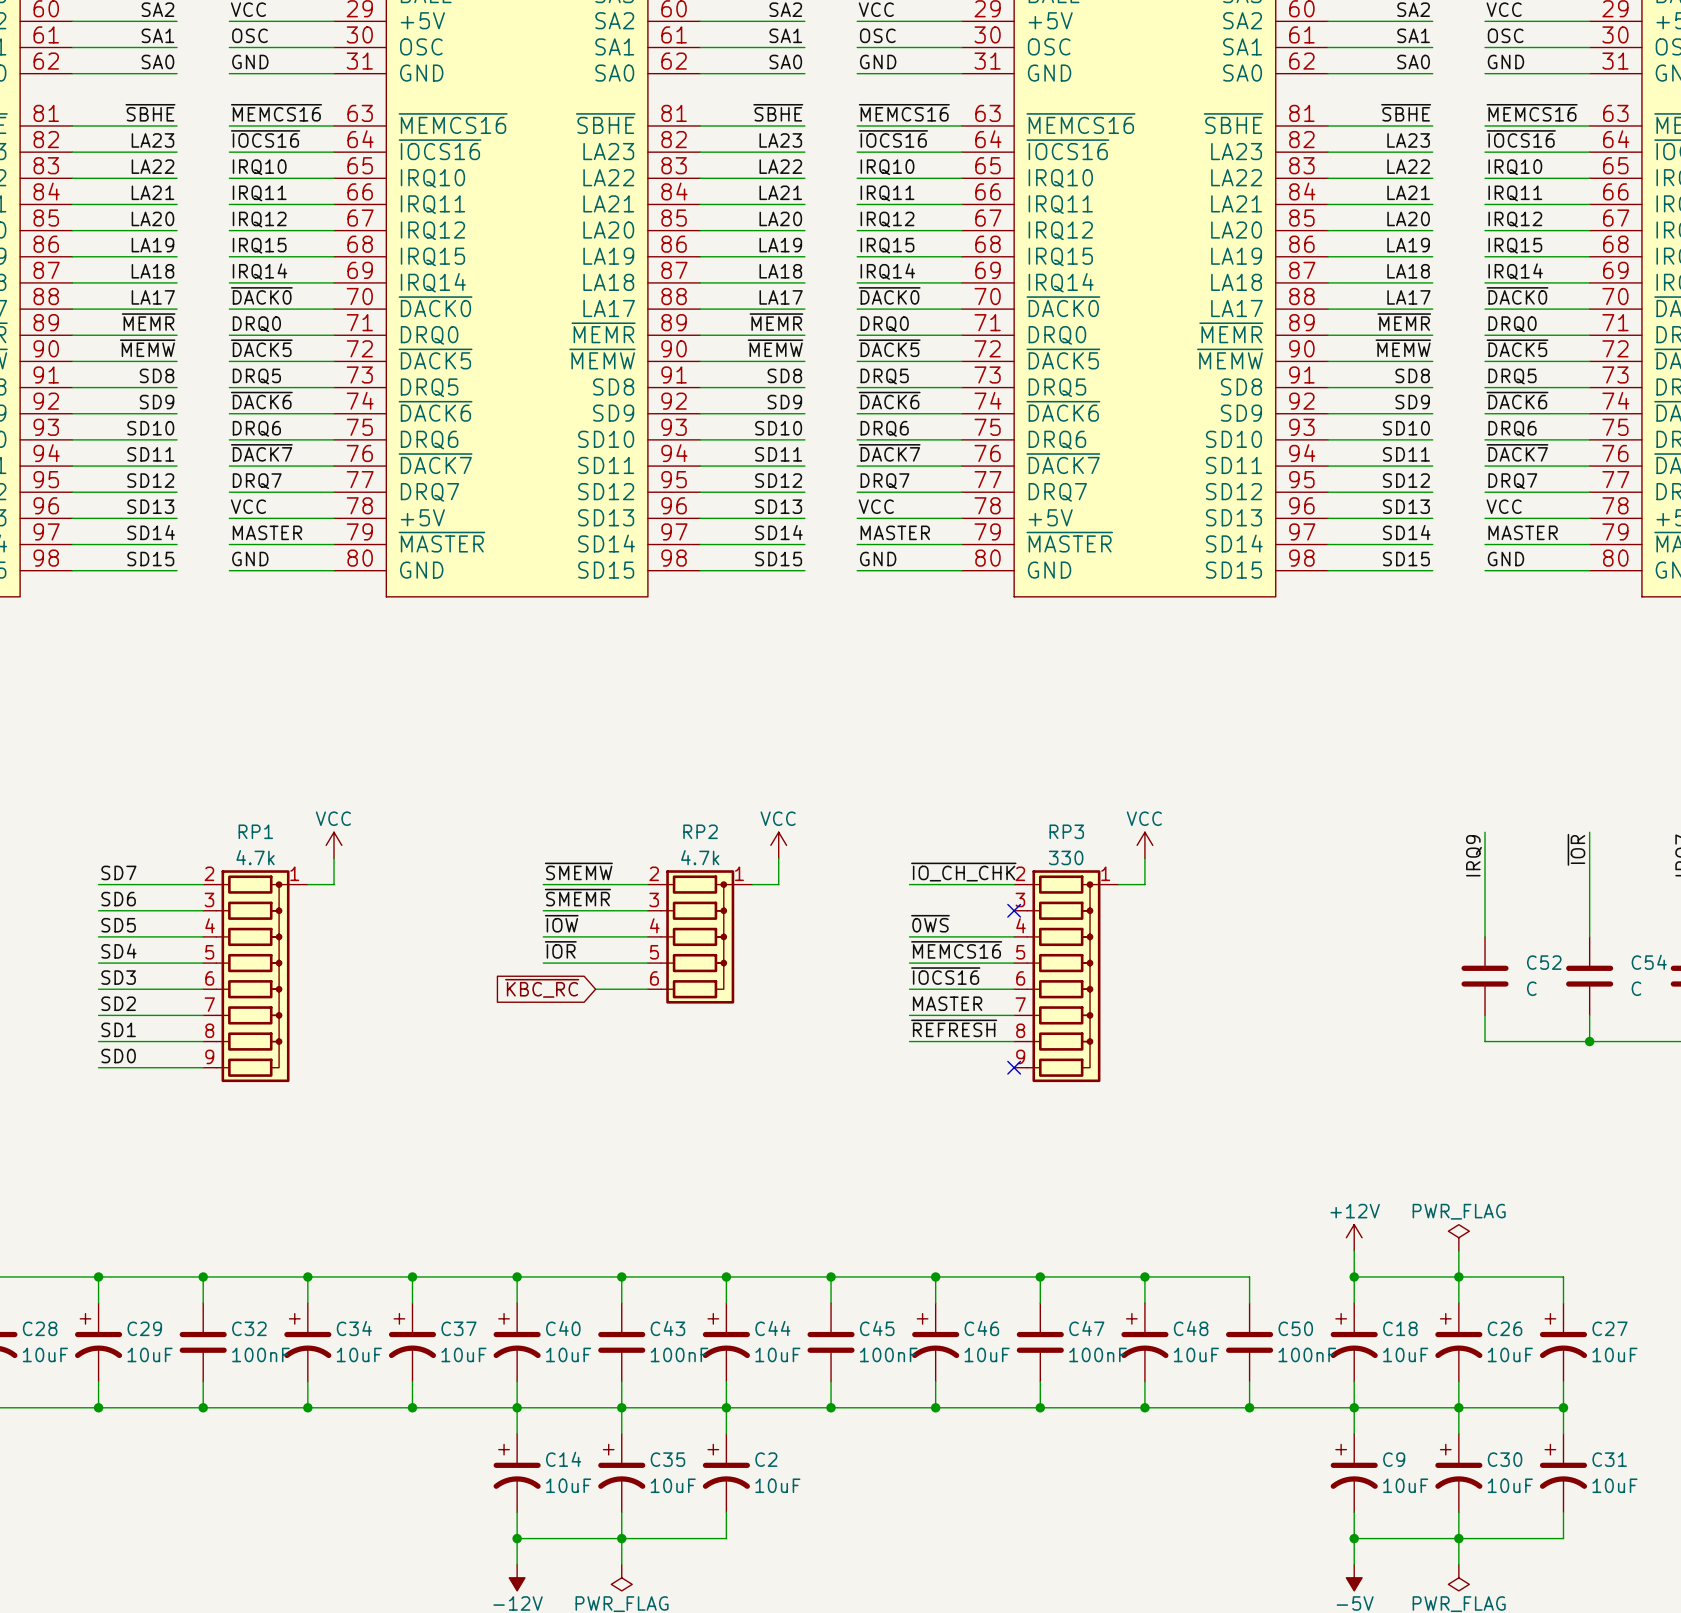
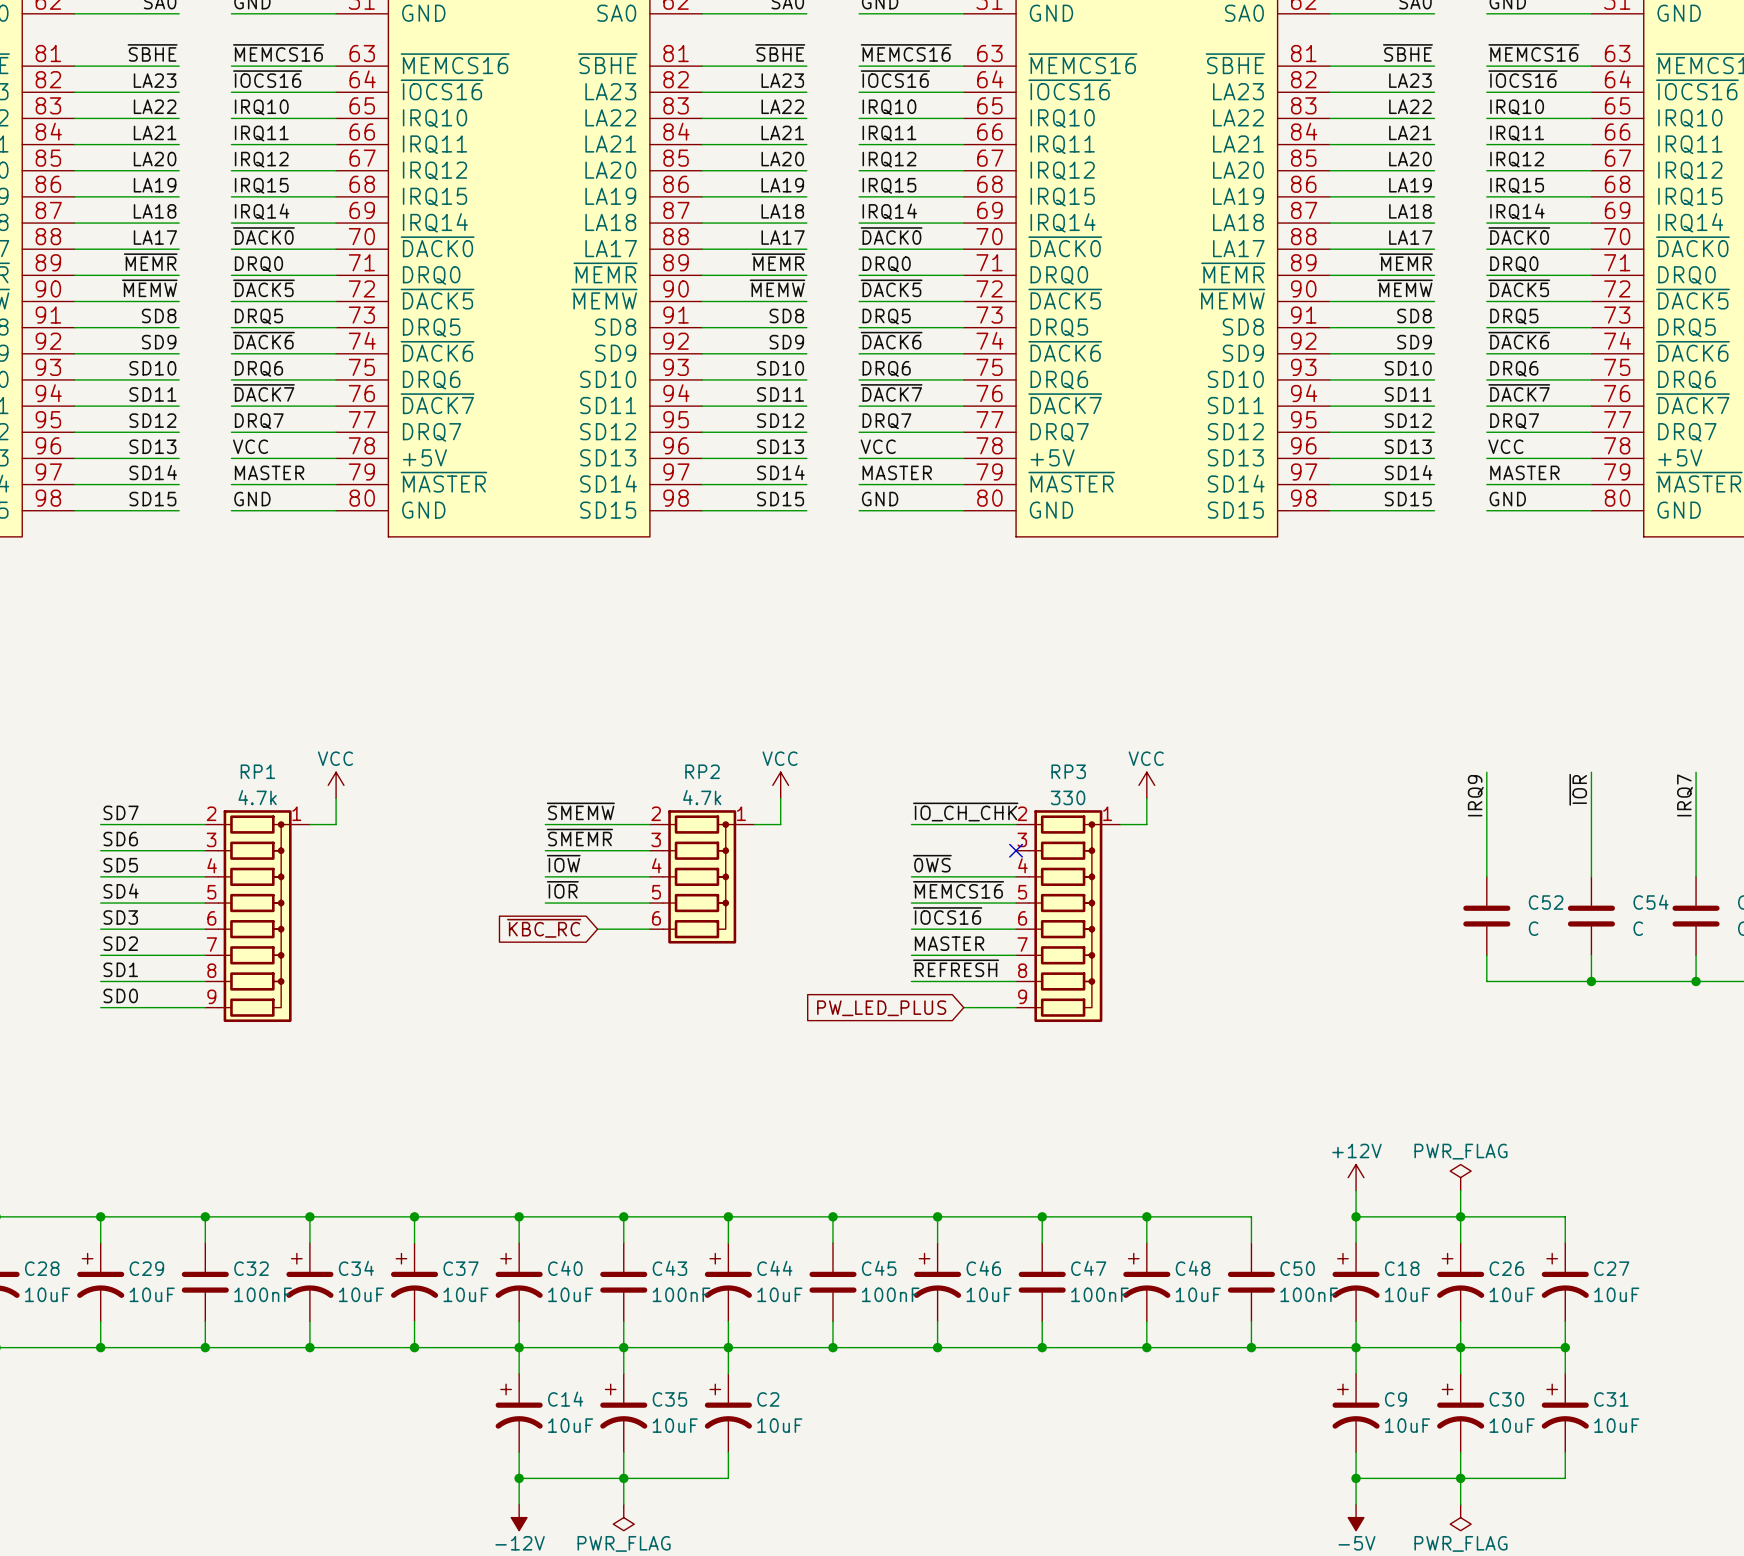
wire: none -> (963, 1007) (1016, 1007)
no-connect mark: (1014, 1067) -> none
global label: none -> PW_LED_PLUS (881, 1008)

